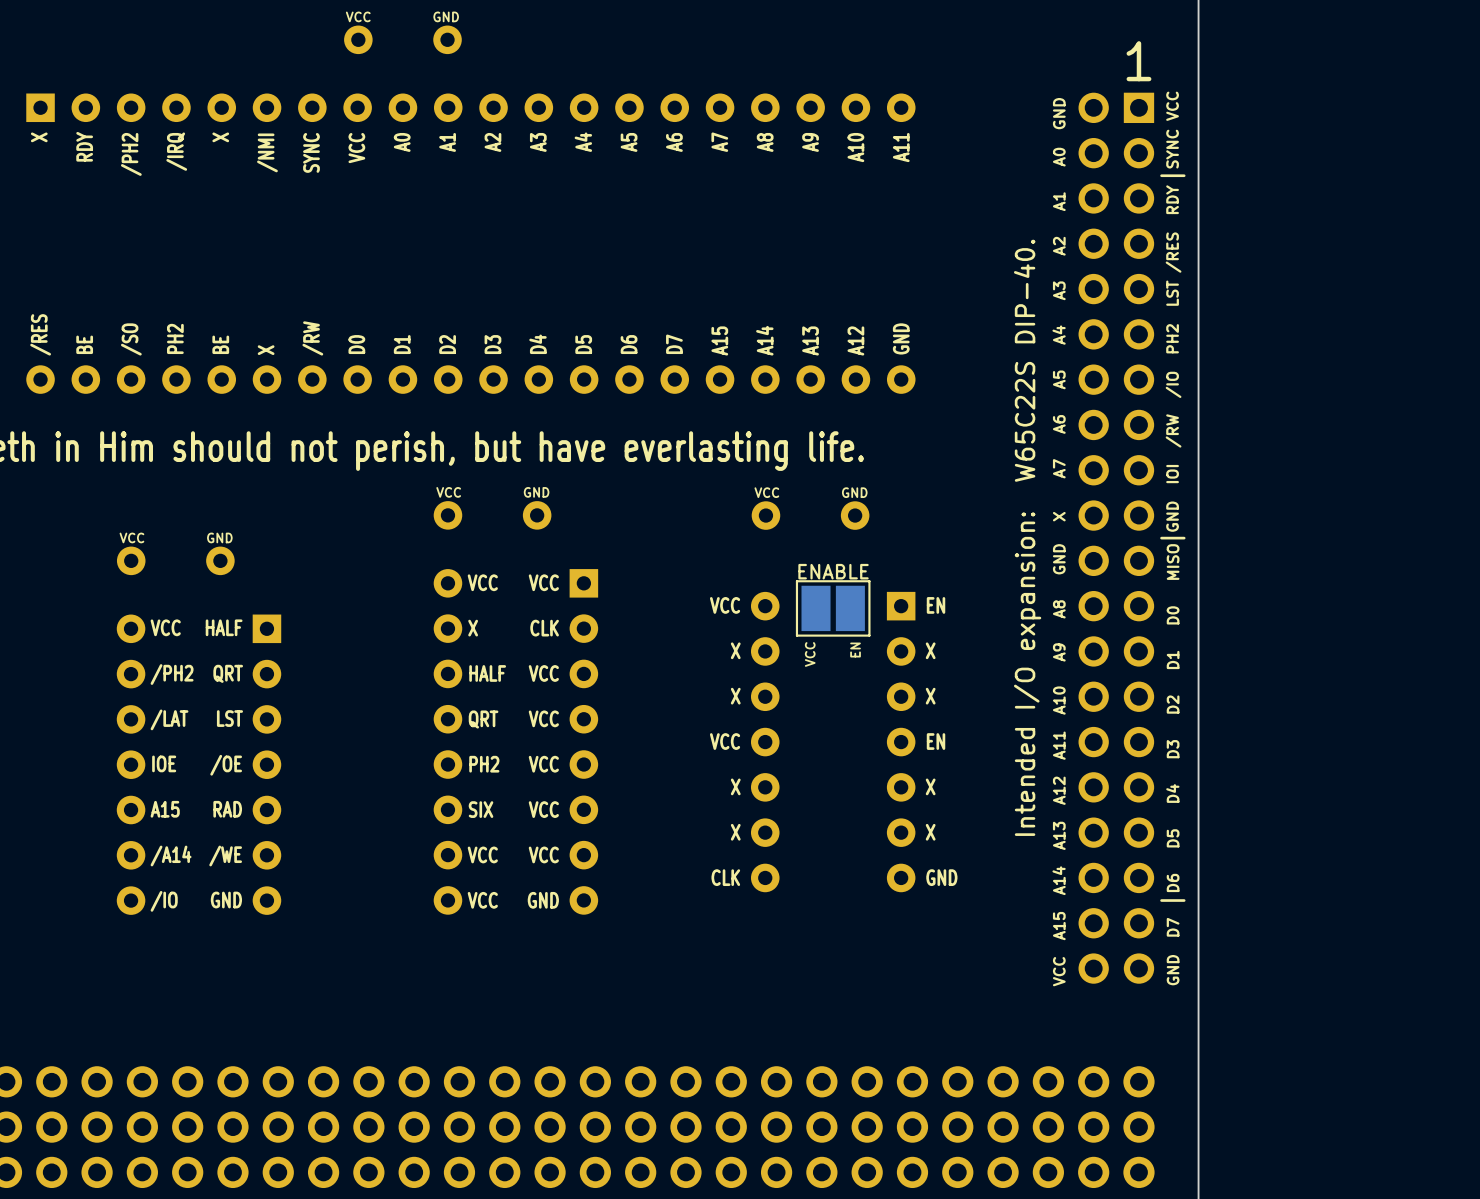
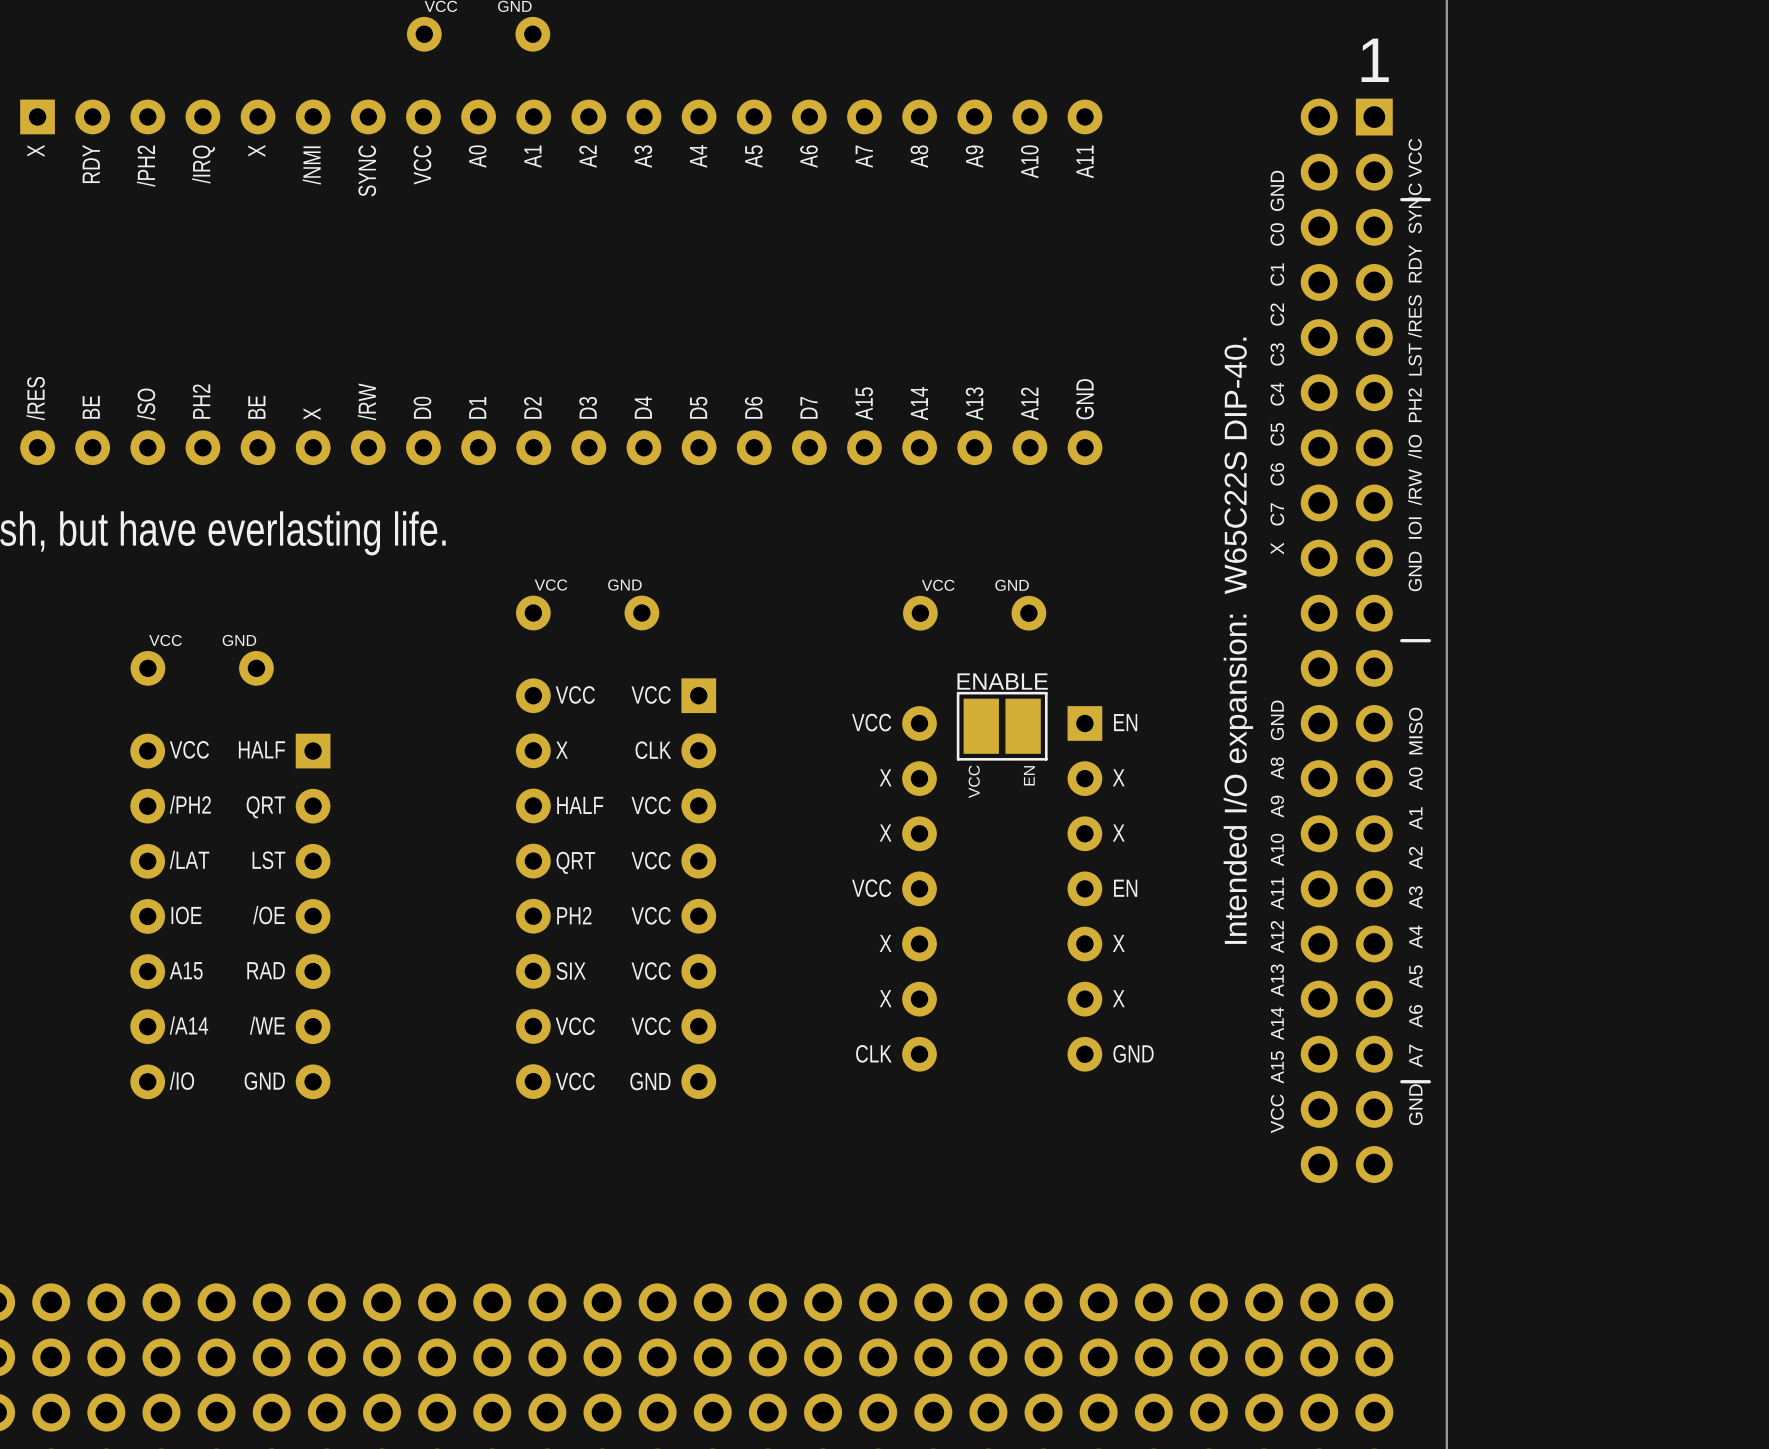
text: X A7 A6 A5 A4 A3 A2 A1 A0 GND (1059, 309) -> X C7 C6 C5 C4 C3 C2 C1 C0 GND (1277, 362)
text: GND D7 D6 D5 D4 D3 D2 D1 D0 MISO (1172, 764) -> GND A7 A6 A5 A4 A3 A2 A1 A0 MISO (1415, 916)

